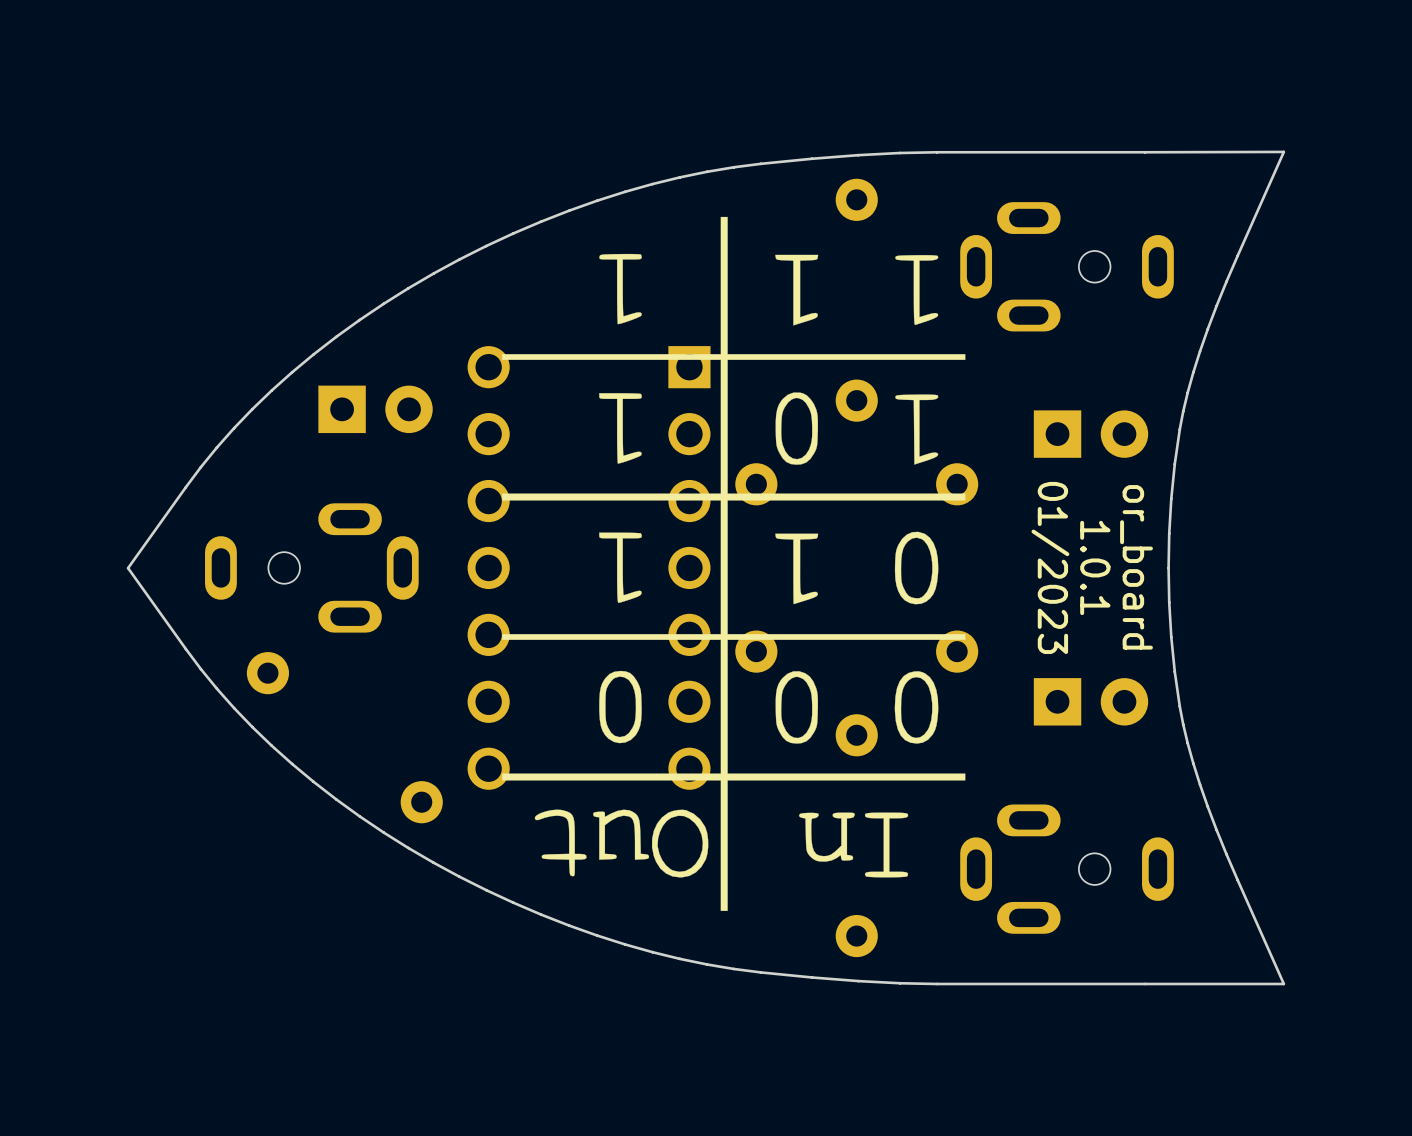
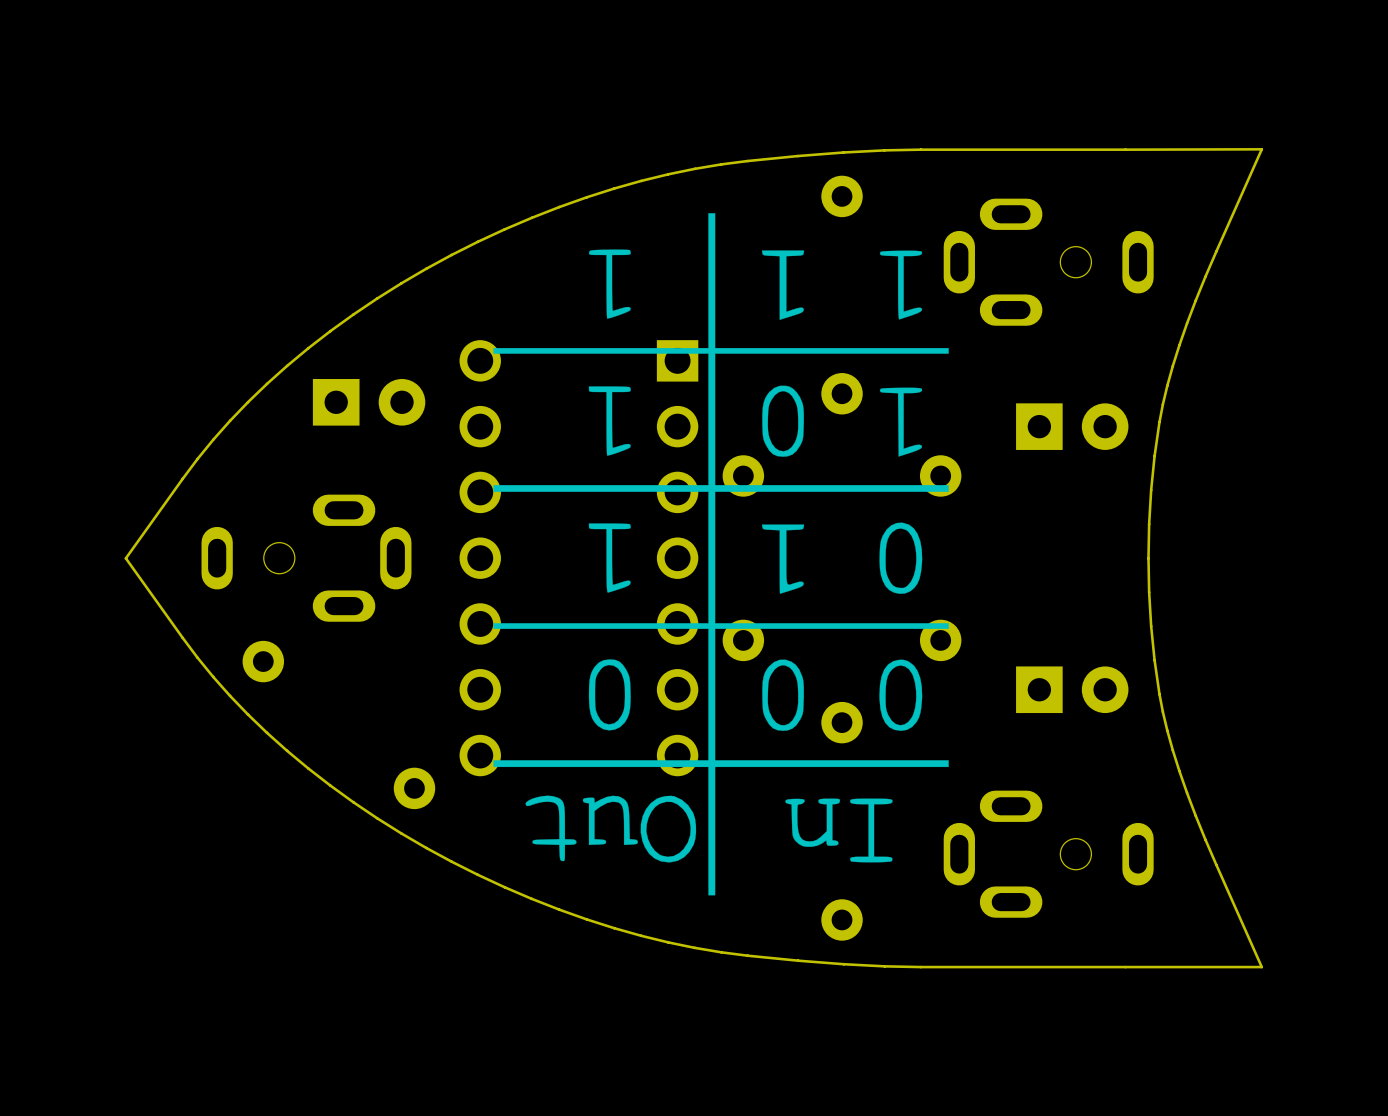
text: 01/2023 (1050, 567) -> none
text: 1.0.1 (1095, 567) -> none
text: or_board (1136, 567) -> none

